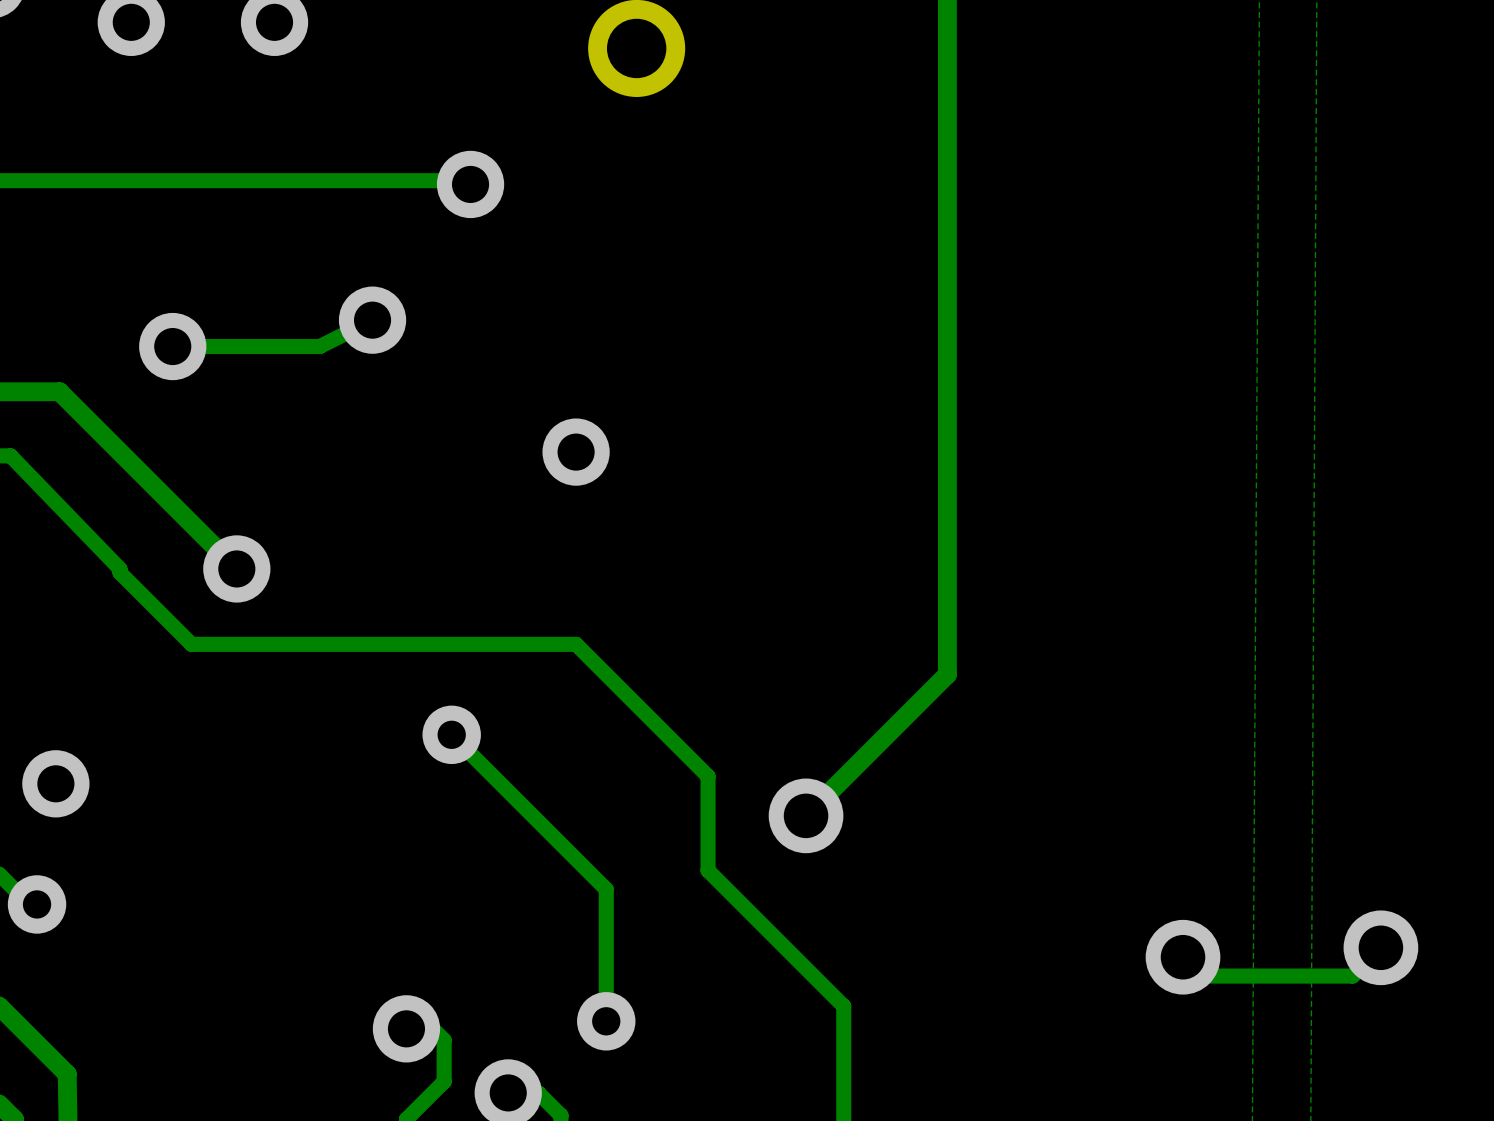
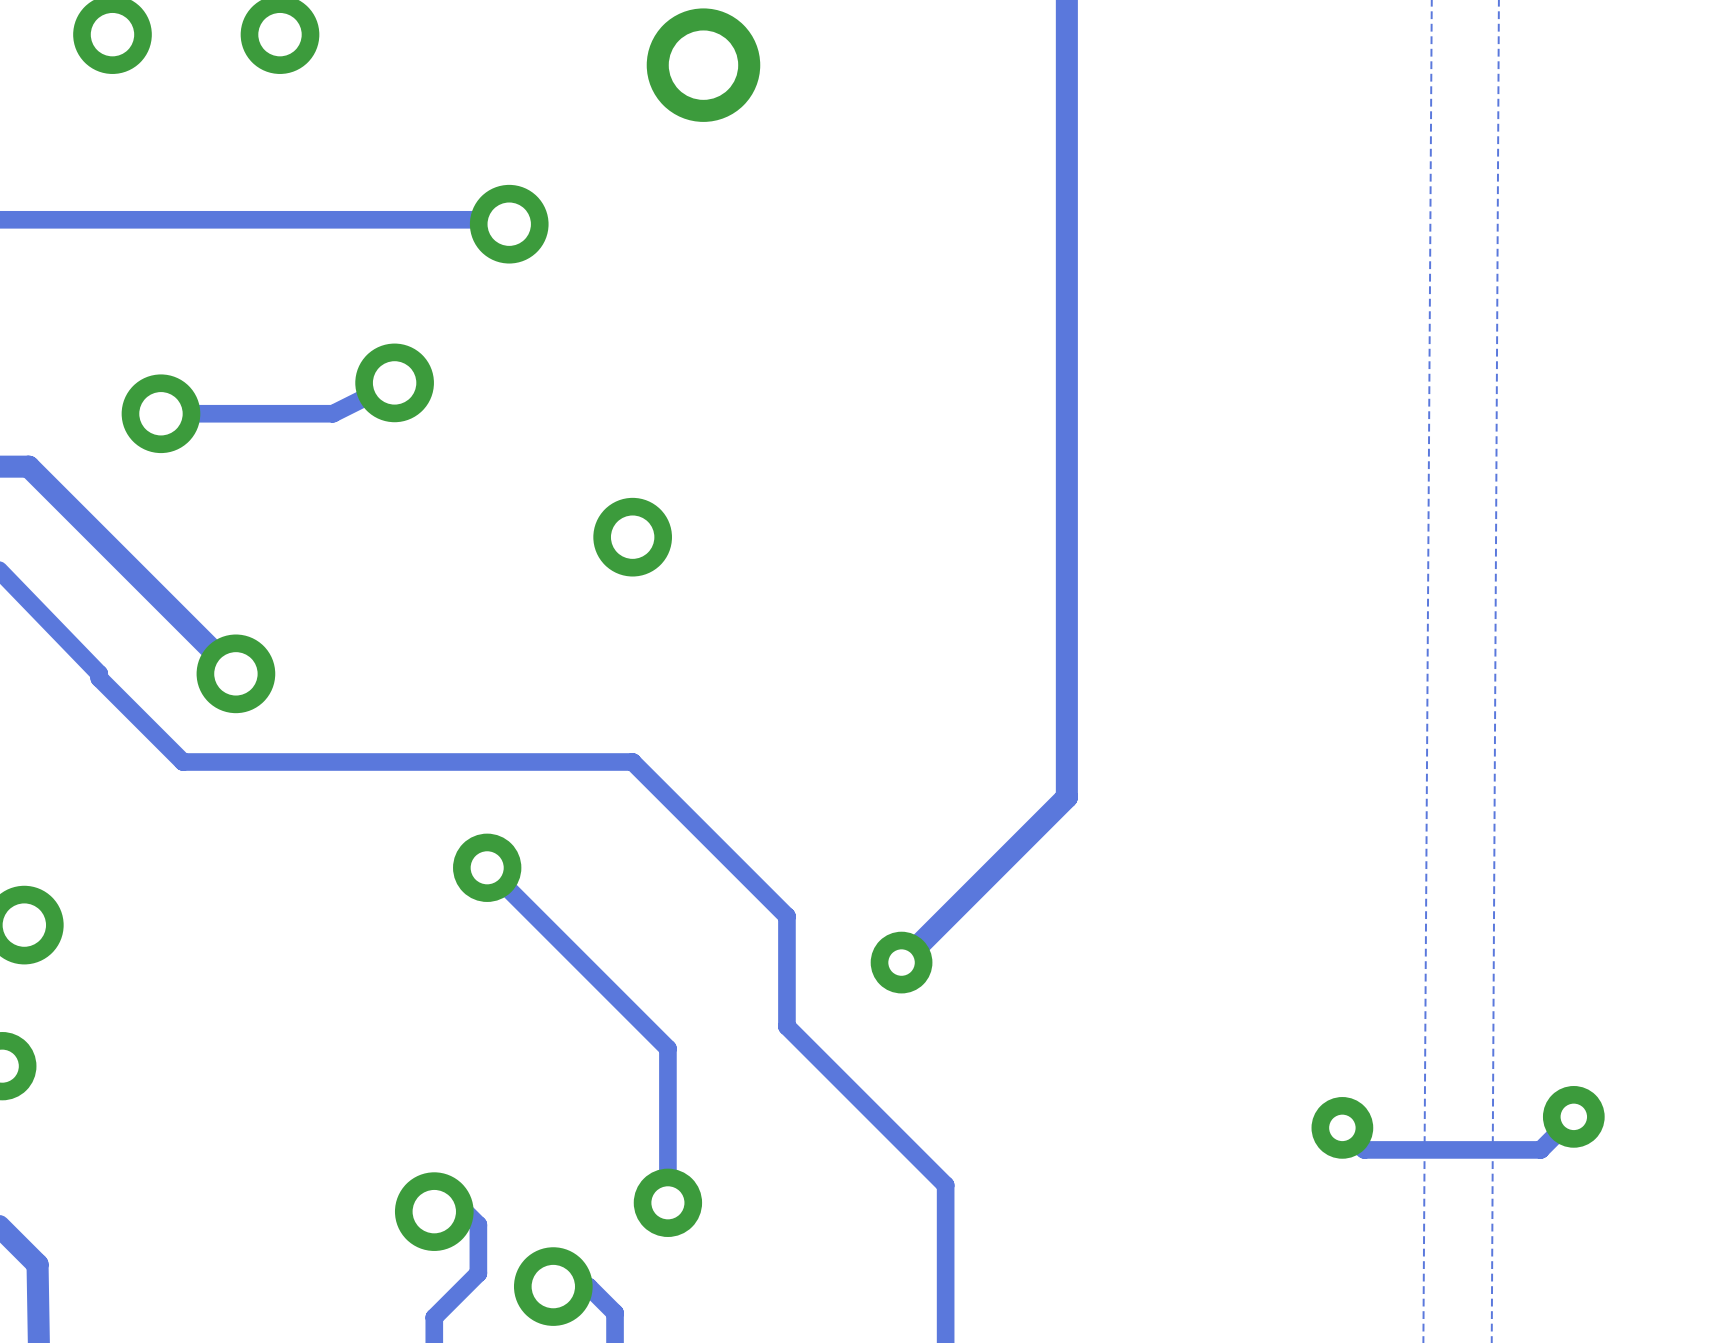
via size: [768, 778, 844, 854] -> [870, 931, 933, 994]
via size: [1343, 910, 1419, 986] -> [1542, 1086, 1605, 1148]
via size: [1145, 919, 1221, 995] -> [1311, 1097, 1374, 1159]

